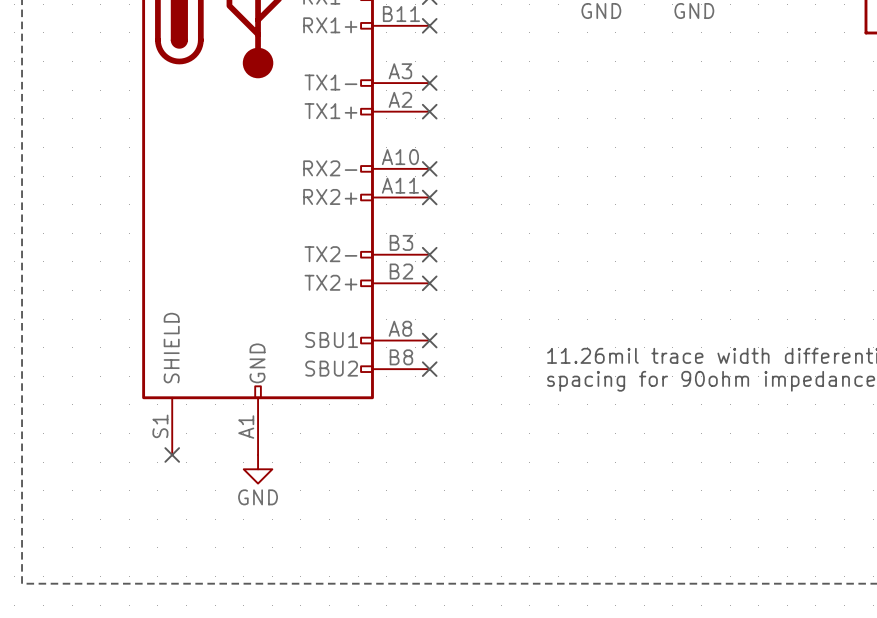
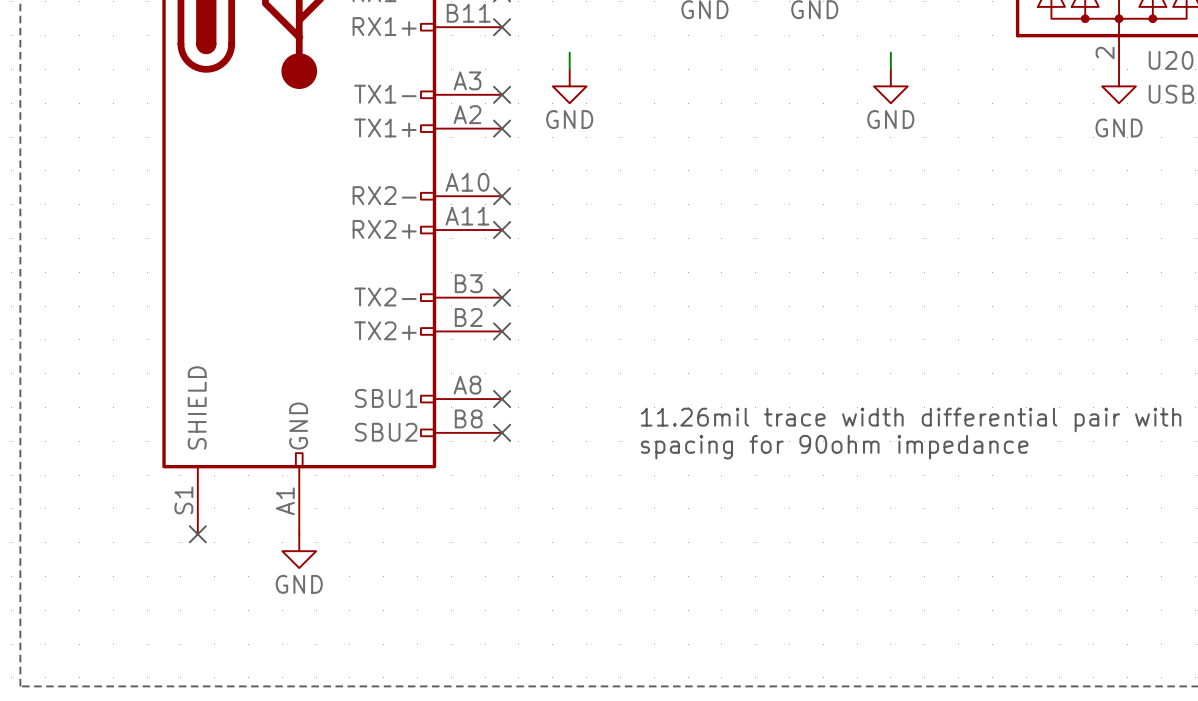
wire: none -> (569, 52) (569, 69)
wire: none -> (890, 52) (890, 69)
power symbol: none -> GND (569, 86)
power symbol: none -> GND (890, 86)

